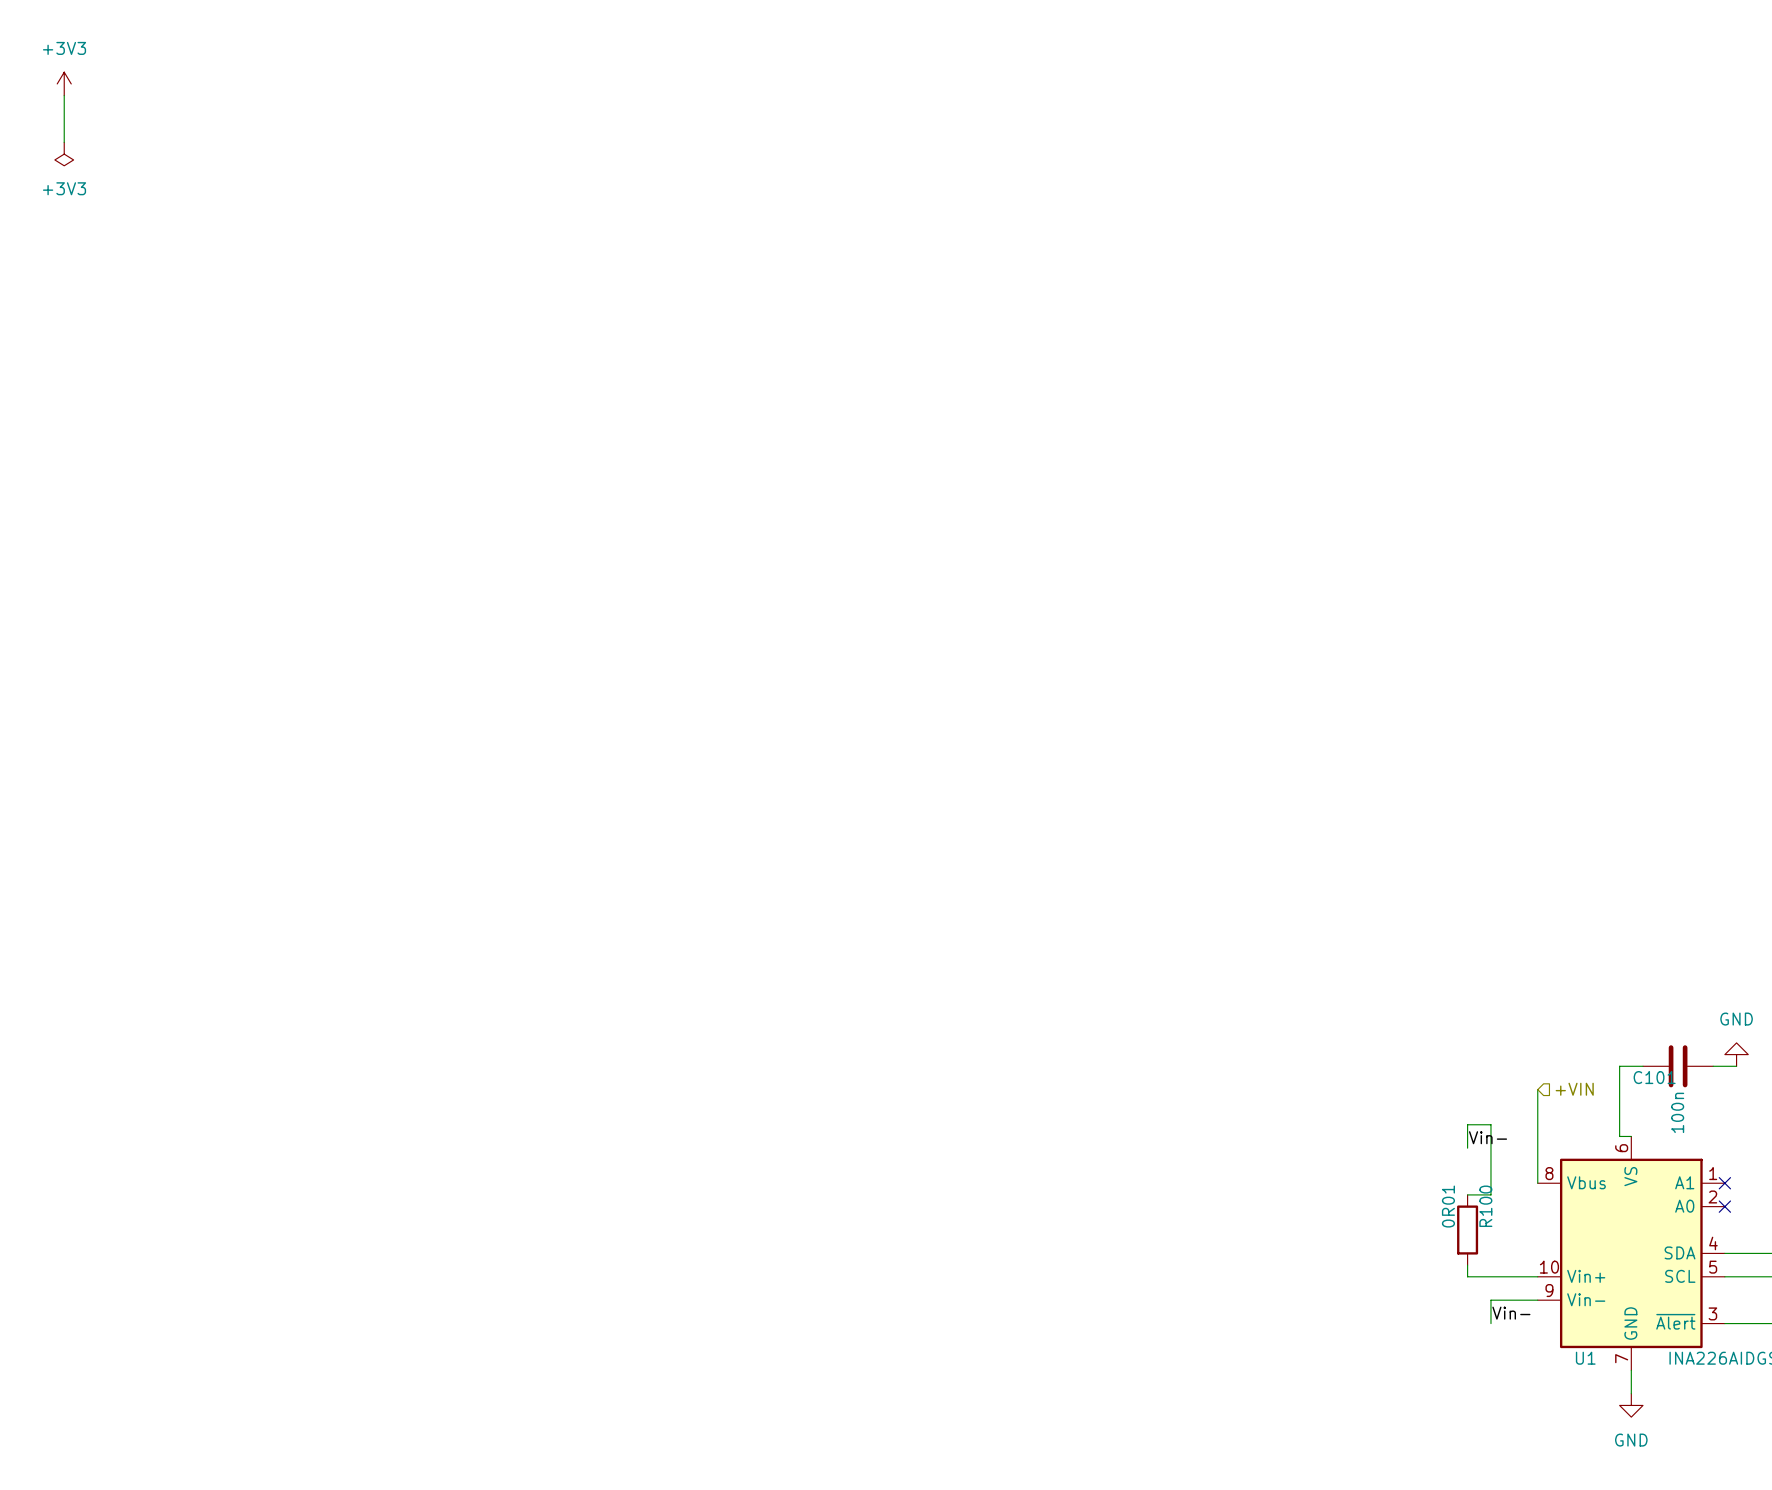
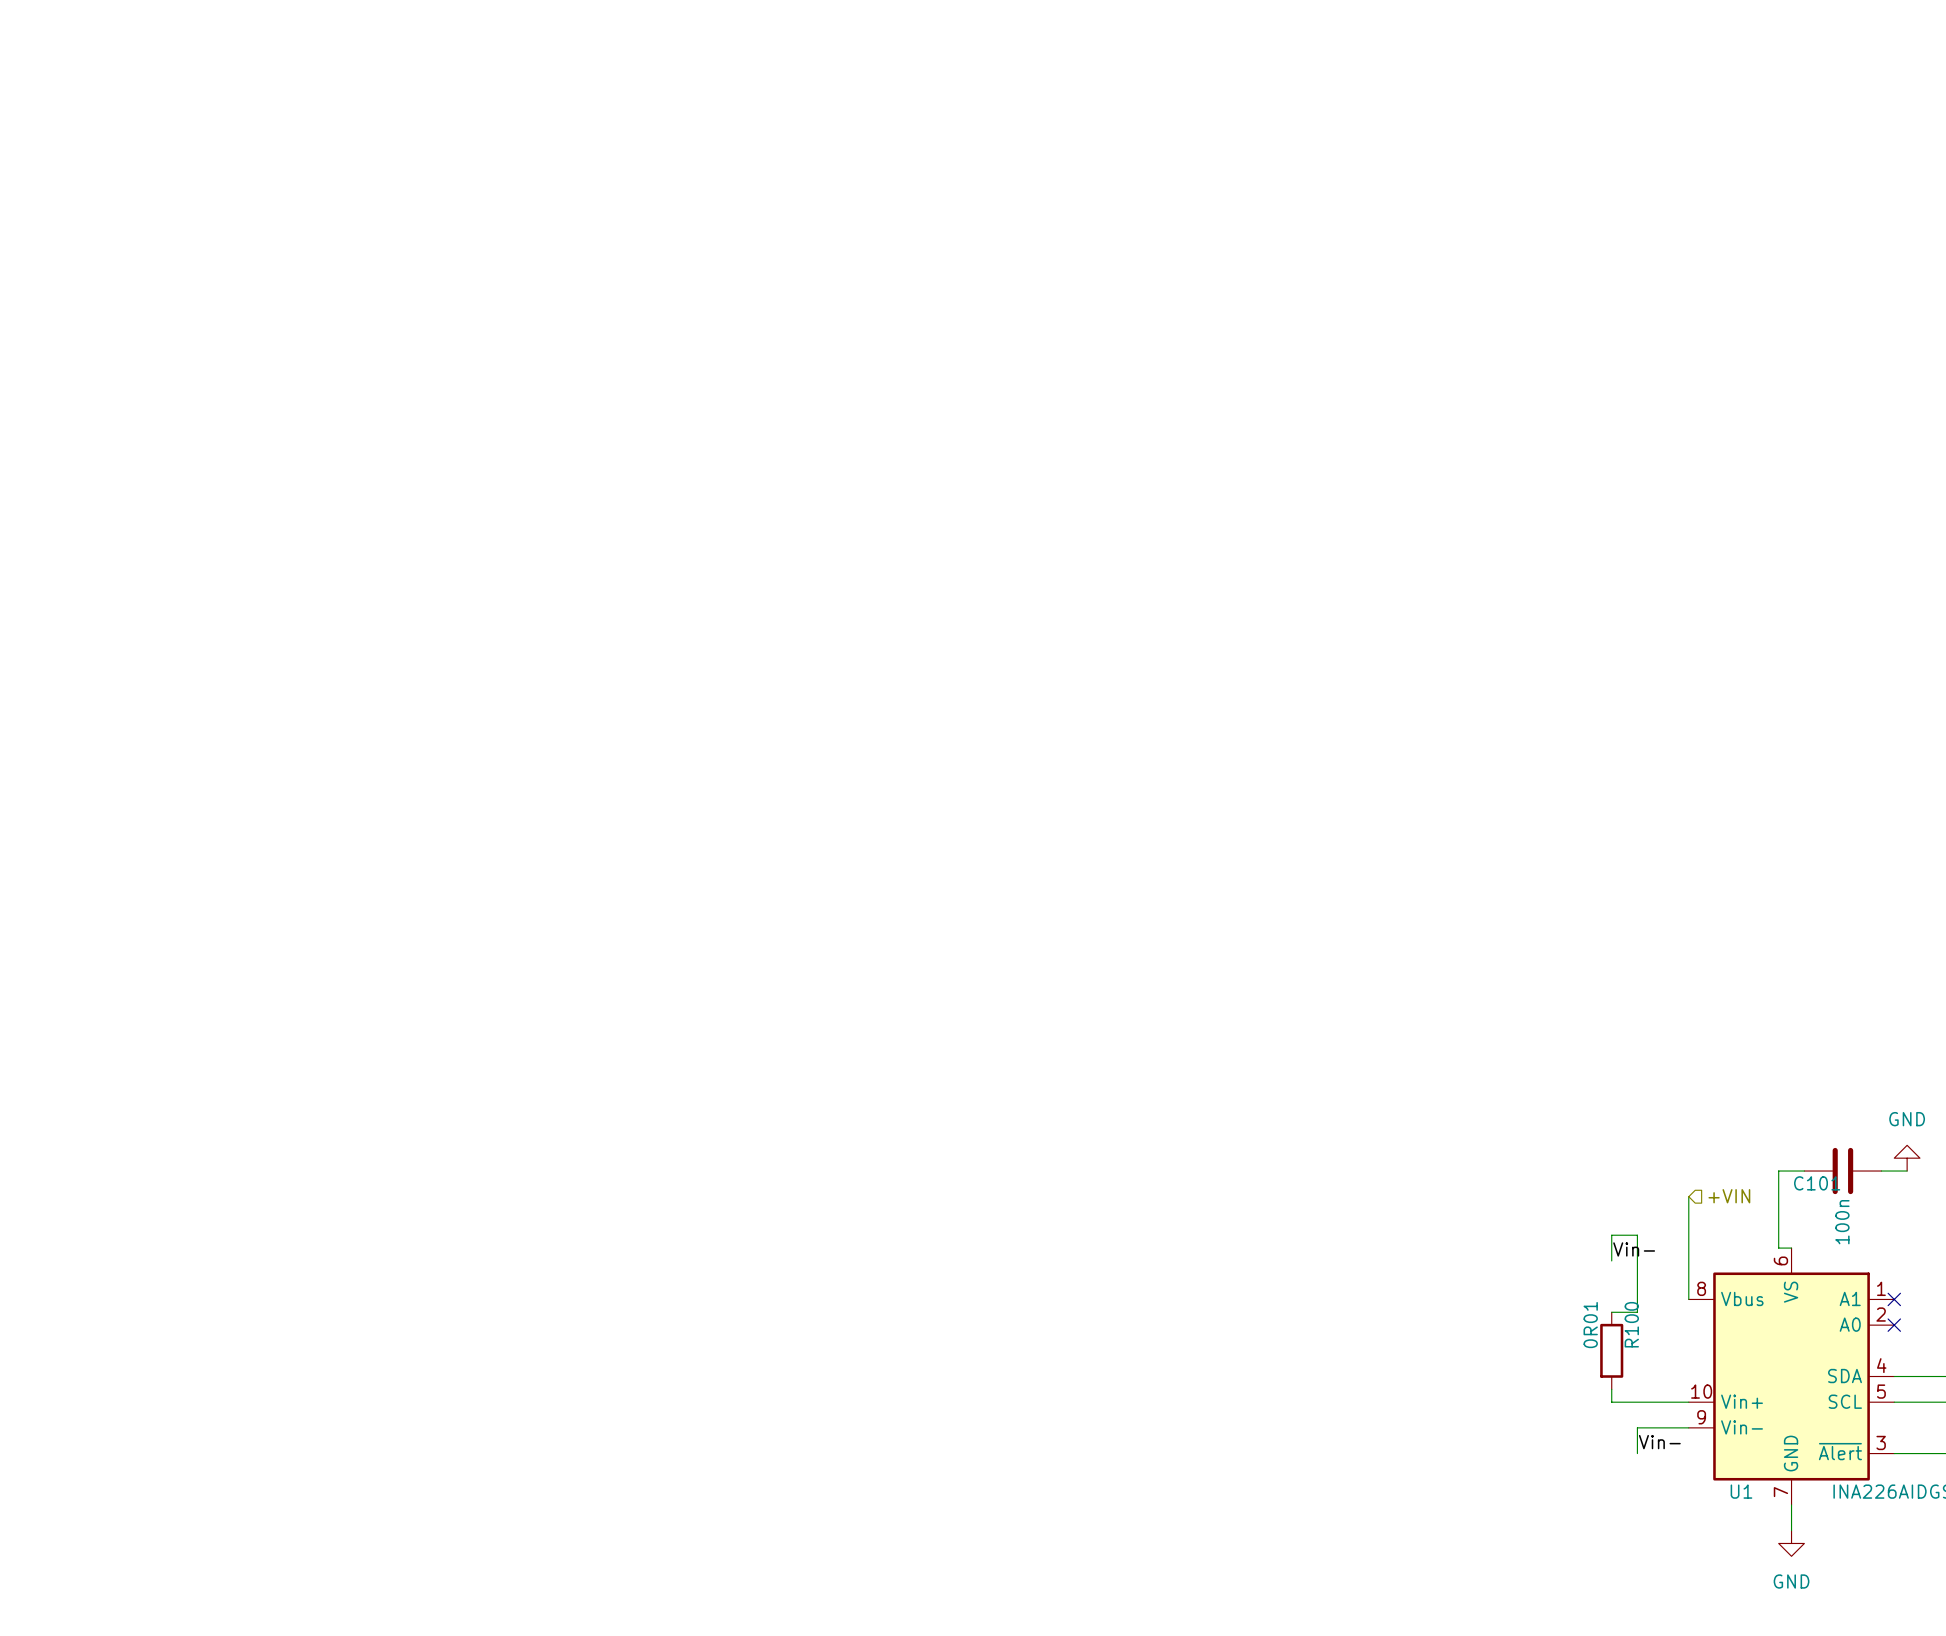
power symbol: +3V3 (64, 83) -> none
wire: (64, 95) (64, 142) -> none
power symbol: +3V3 (64, 154) -> none

